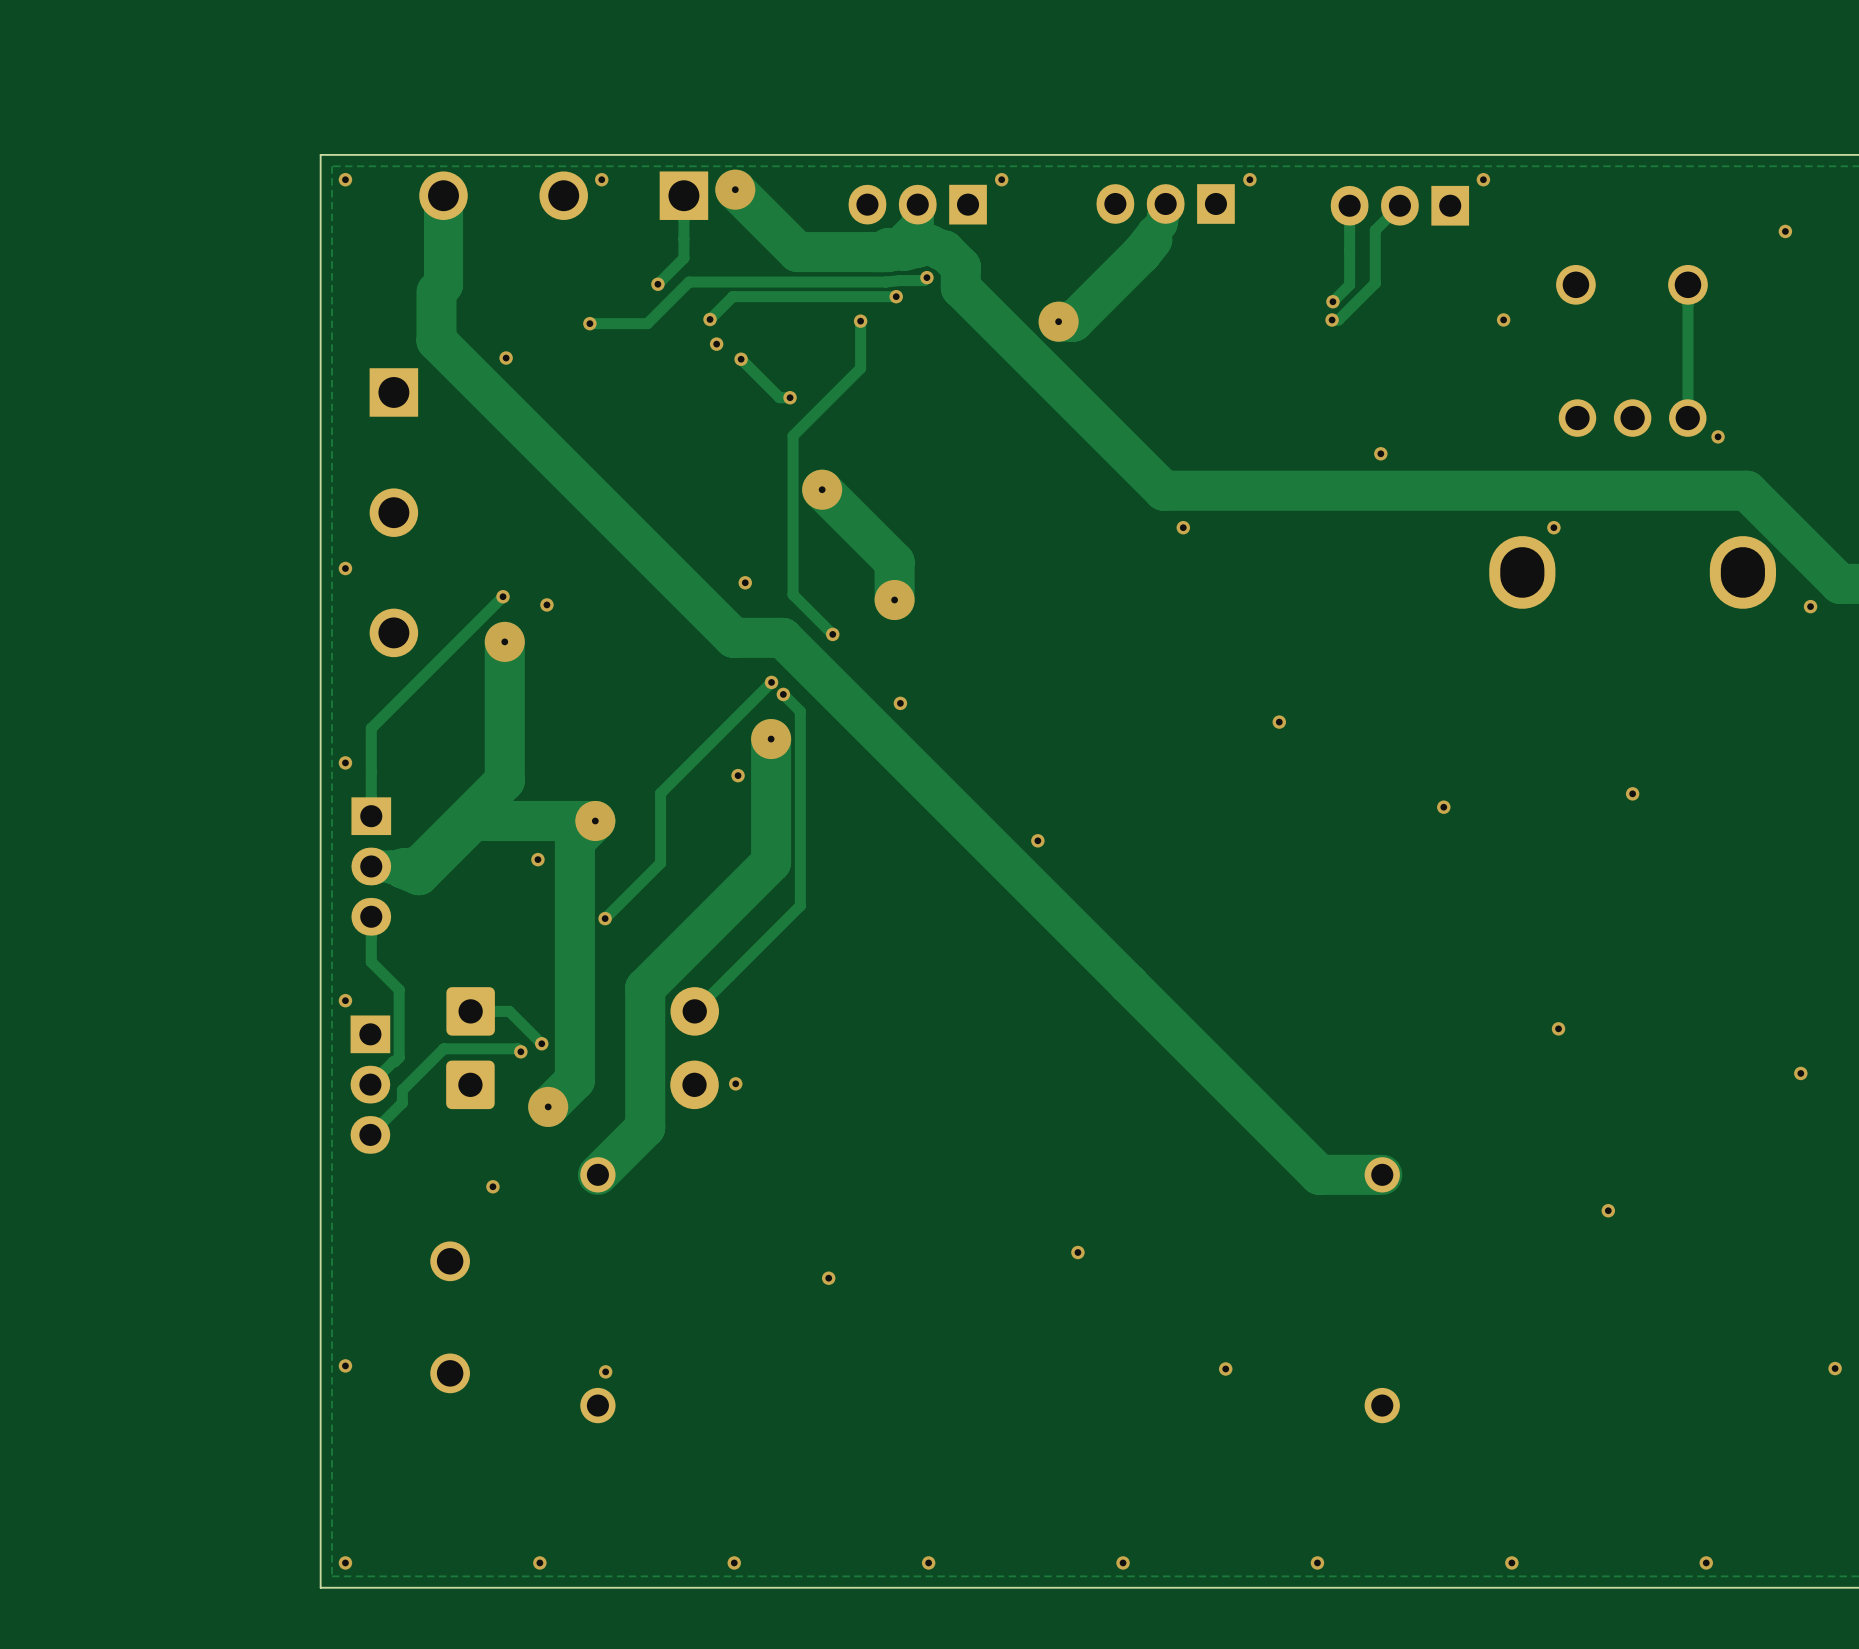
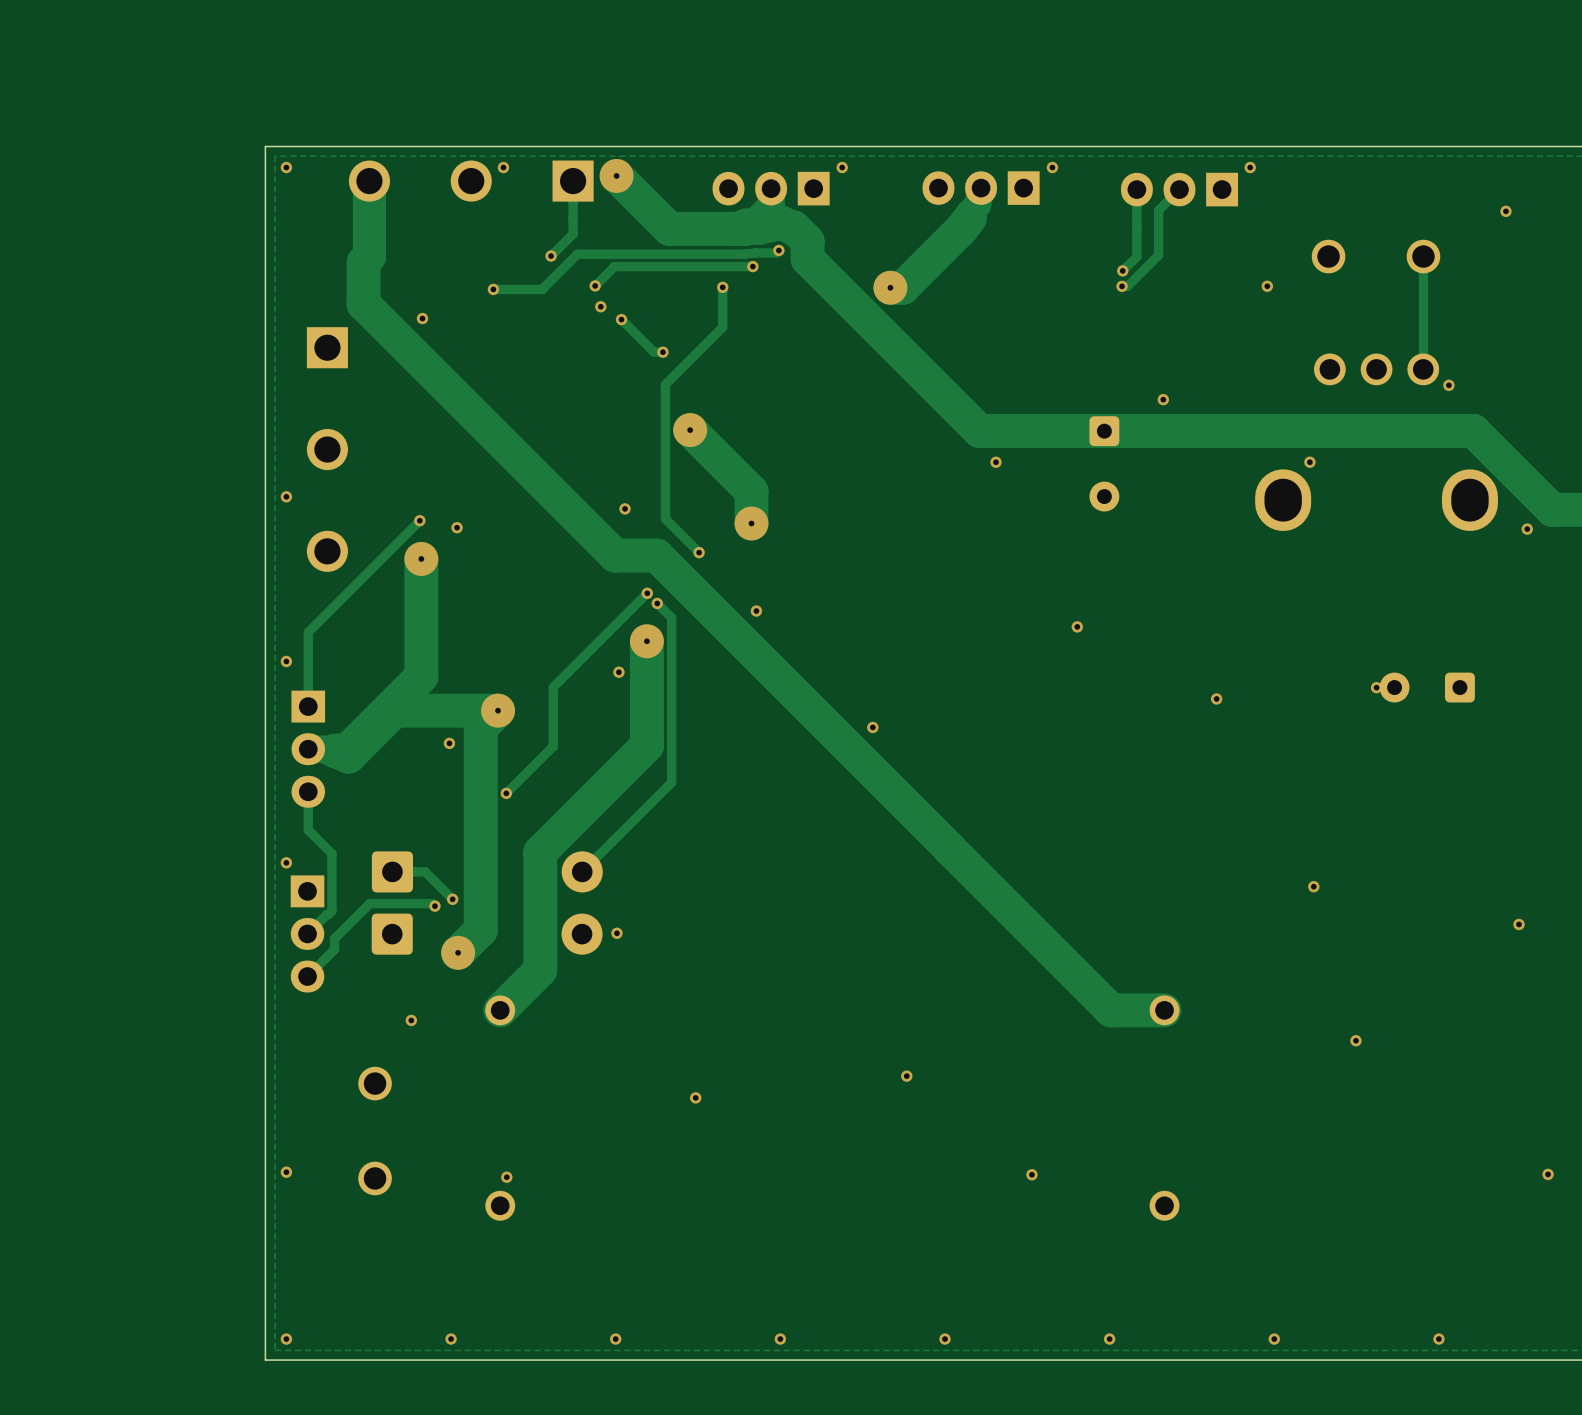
part: none -> (1104, 463)
part: none -> (1427, 687)

